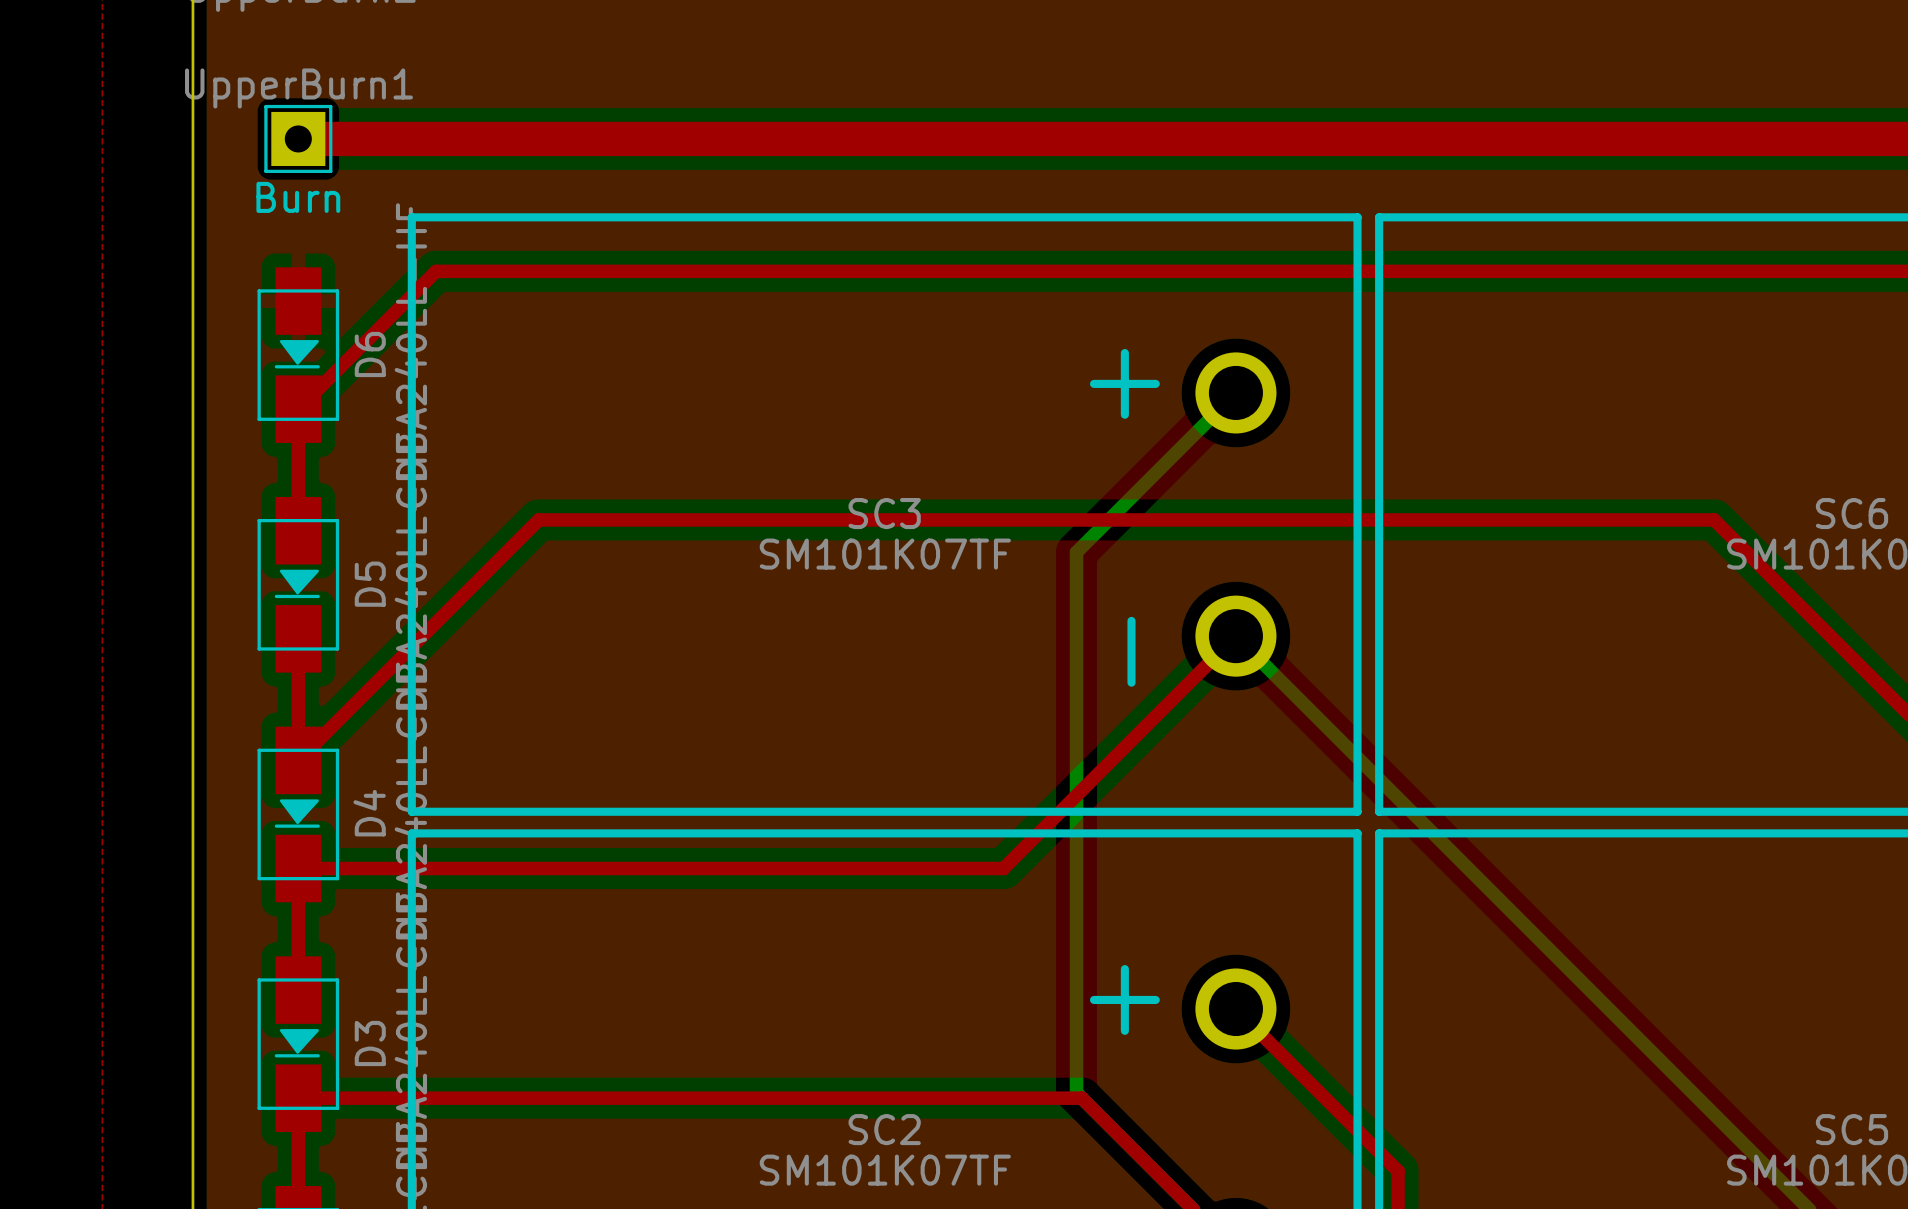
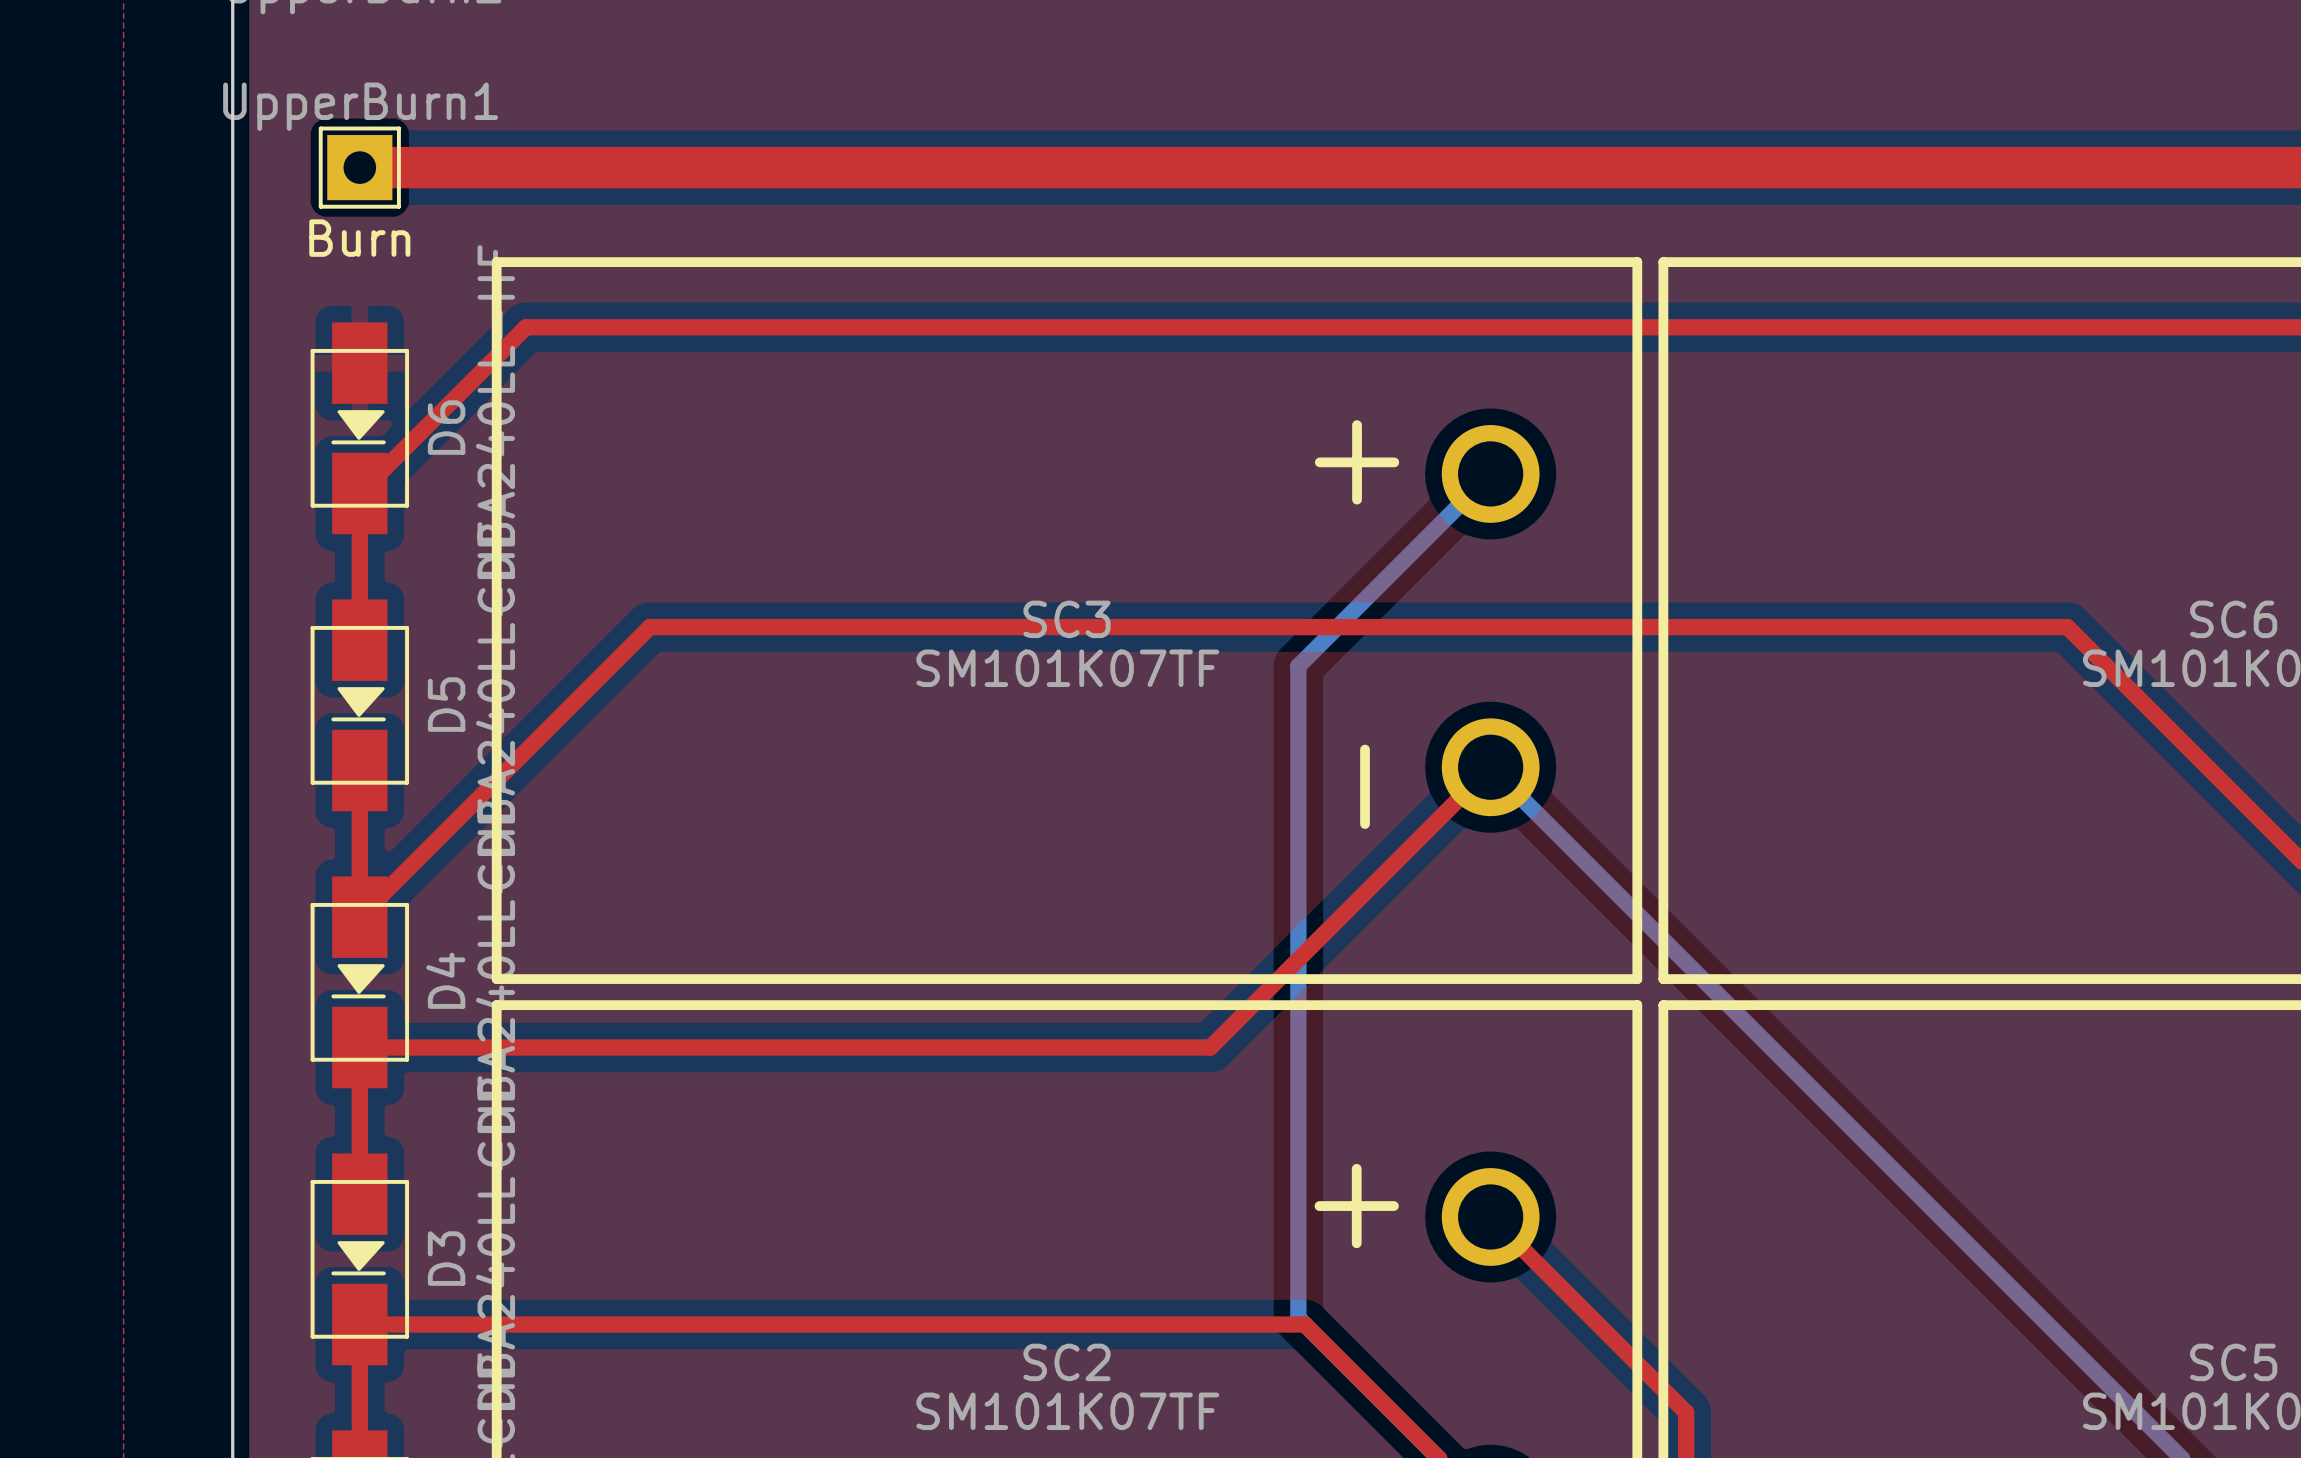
SC3 text: + (1124, 383) -> none
text: none -> + (1357, 462)
SC3 text: - (1131, 651) -> none
text: none -> - (1365, 786)

